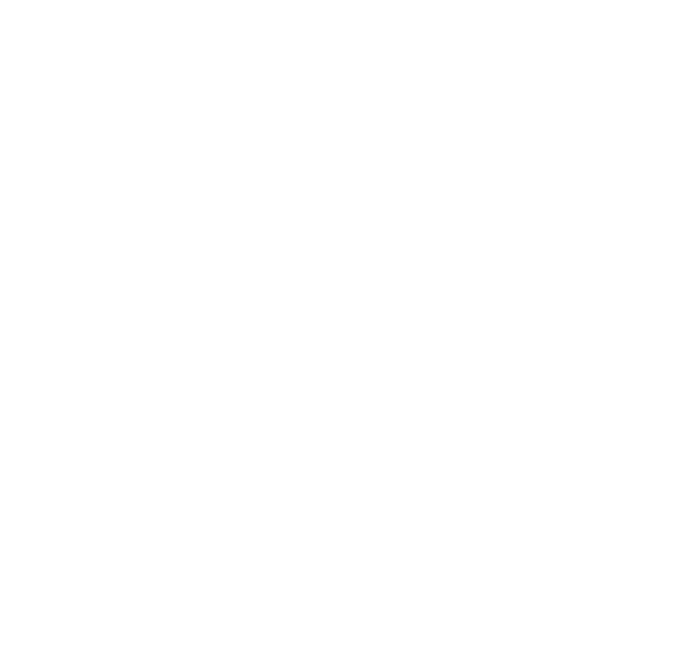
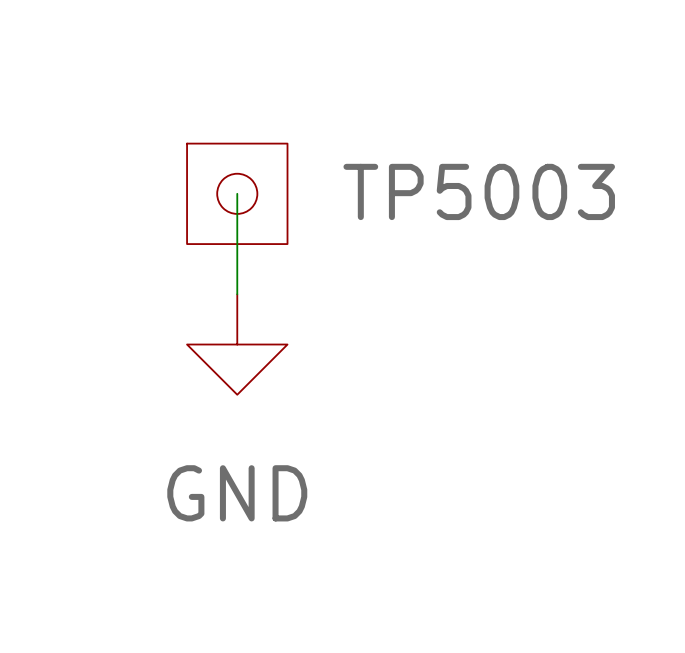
wire: none -> (237, 193) (237, 294)
TP5003: none -> (237, 193)
power symbol: none -> GND (237, 344)

